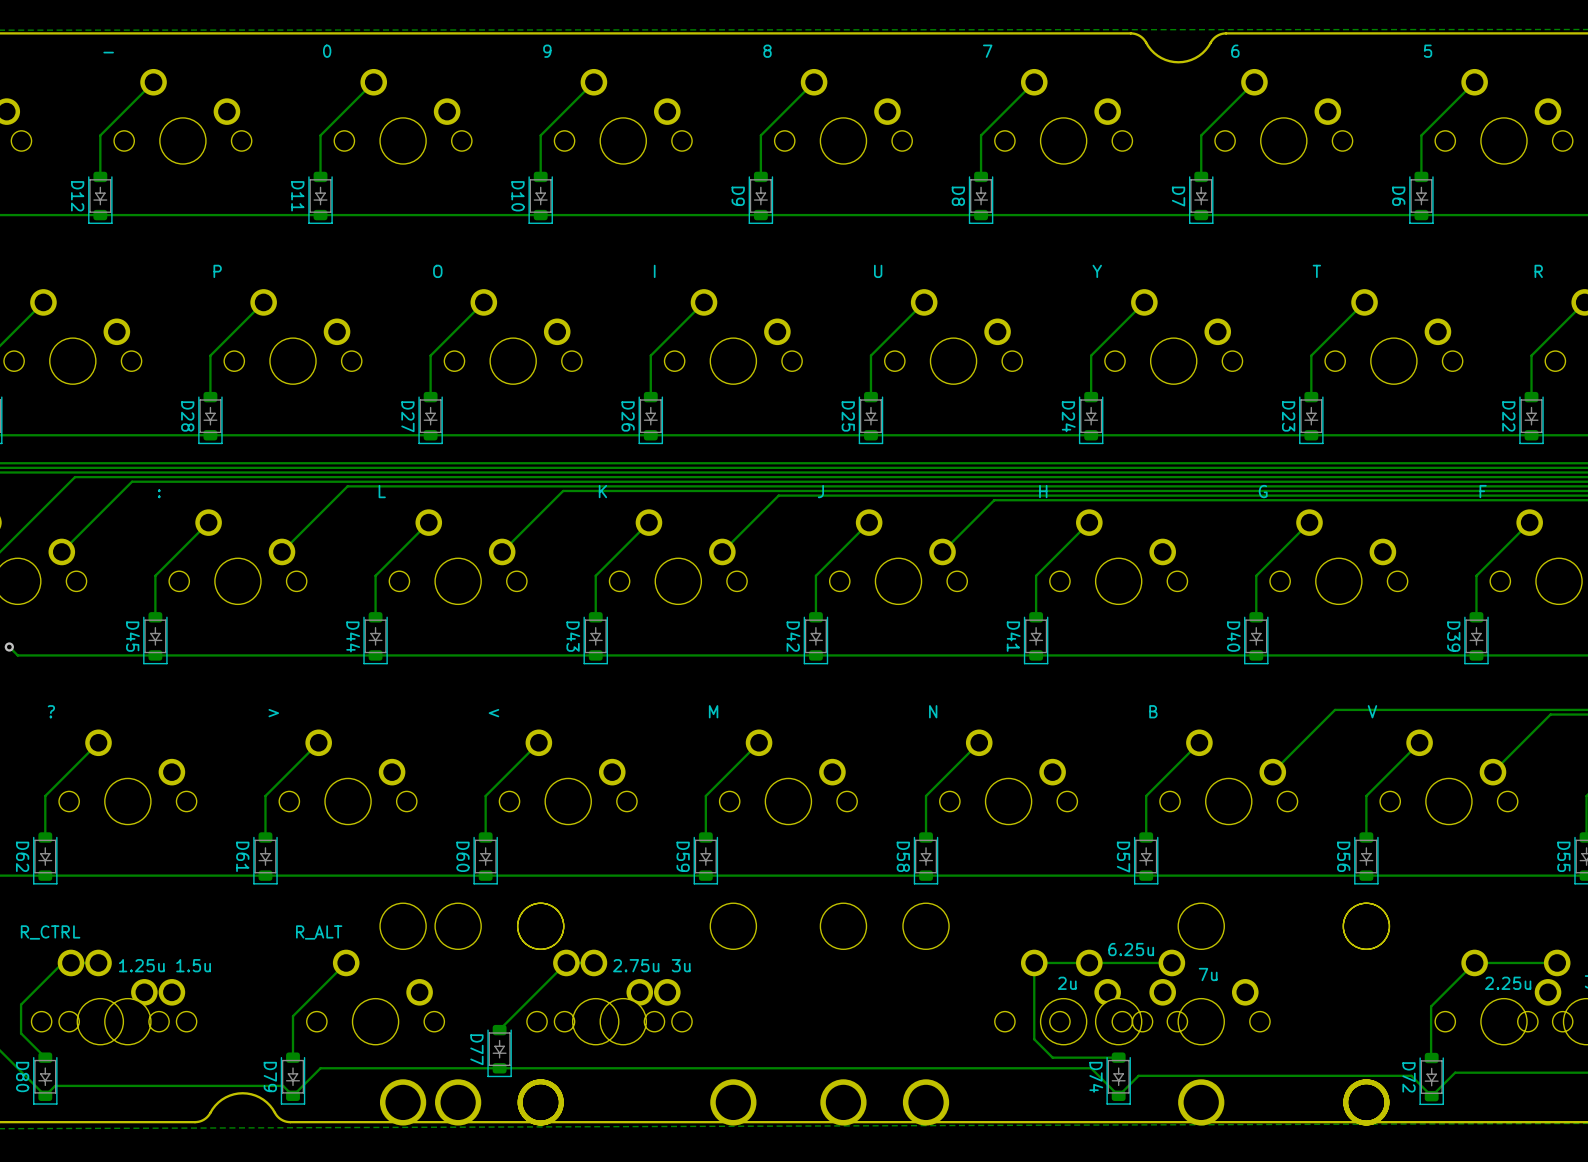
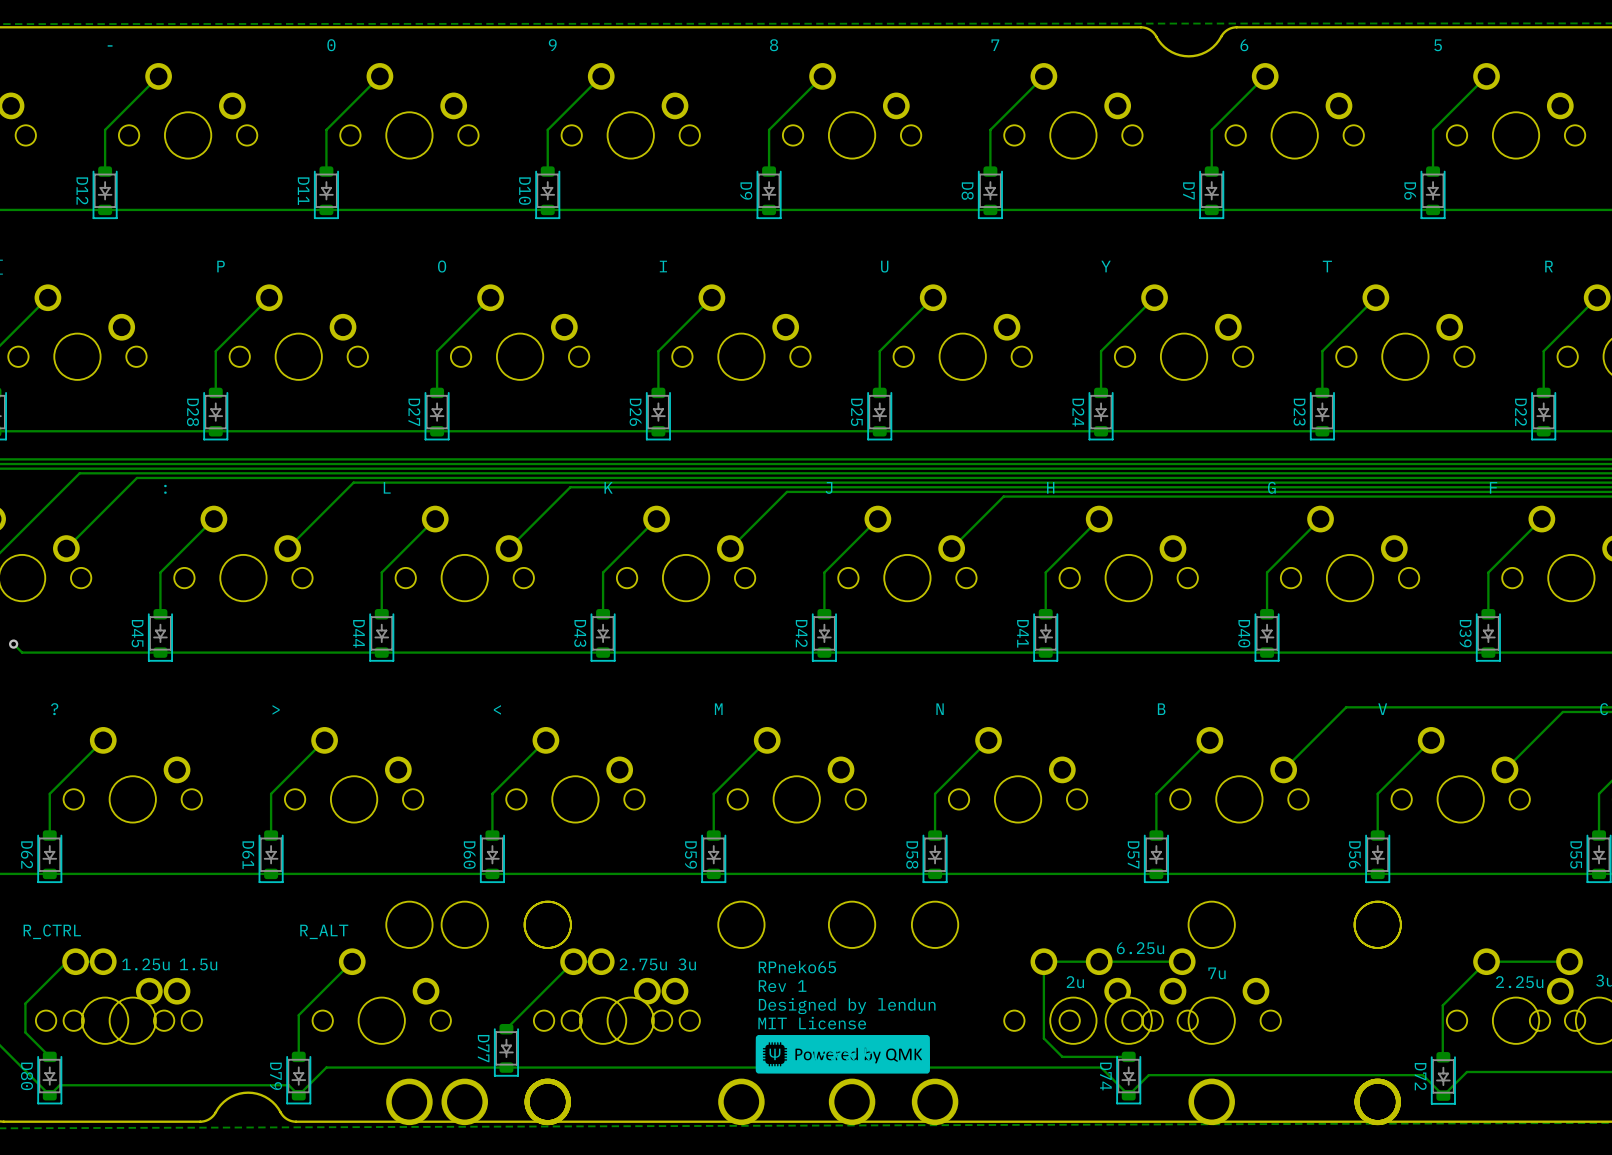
text: none -> RPneko65 (797, 967)
text: none -> Rev 1 (782, 986)
text: none -> Designed by lendun (847, 1006)
text: none -> MIT License (812, 1023)
part: none -> (842, 1054)

